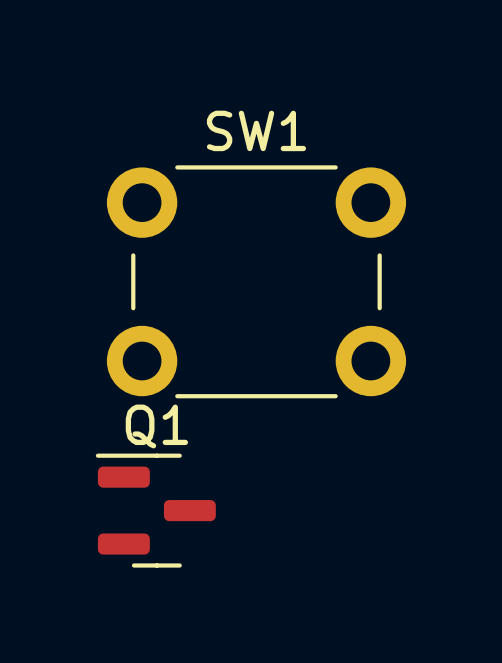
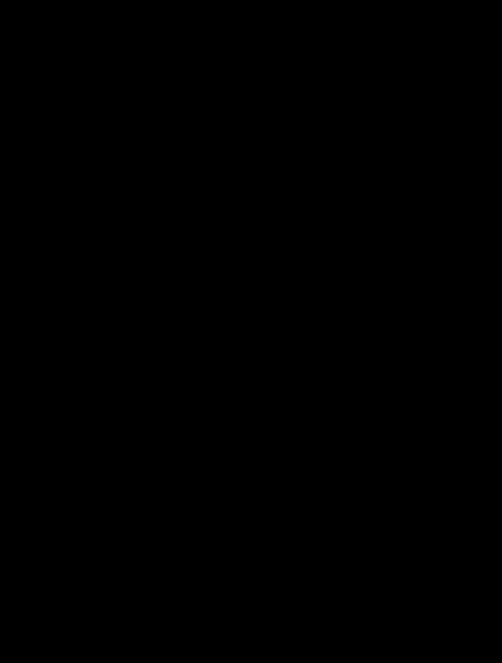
SW1: (256, 281) -> none
Q1: (155, 510) -> none

